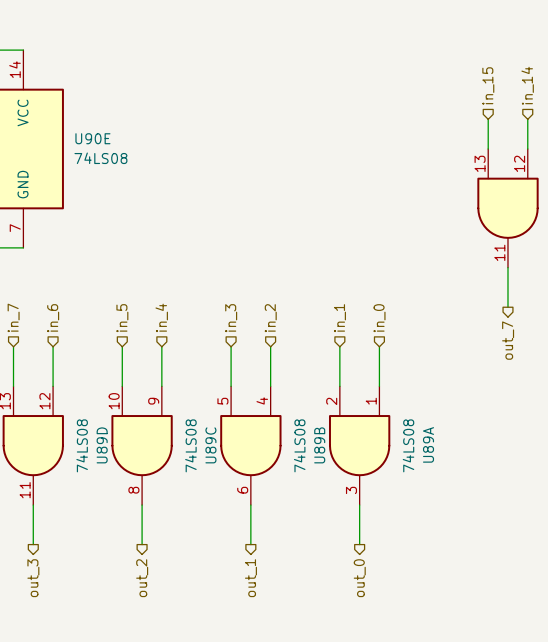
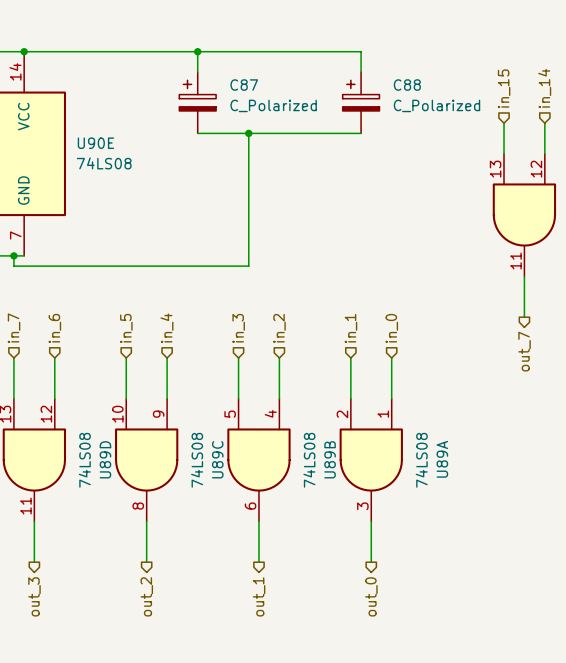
wire: none -> (24, 51) (361, 51) (361, 72)
junction: none -> (24, 51)
wire: none -> (197, 51) (197, 72)
junction: none -> (197, 51)
C87: none -> C_Polarized (197, 102)
C88: none -> C_Polarized (361, 102)
wire: none -> (197, 133) (361, 133)
wire: none -> (248, 133) (248, 266) (13, 266) (13, 255)
junction: none -> (248, 133)
junction: none -> (13, 255)

